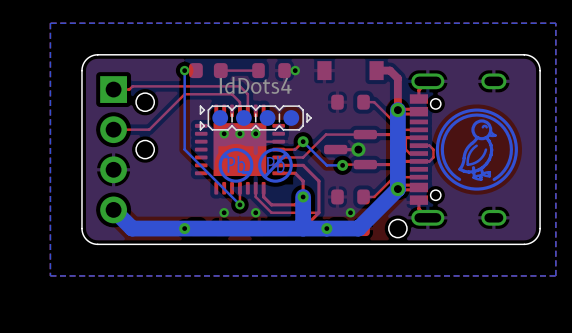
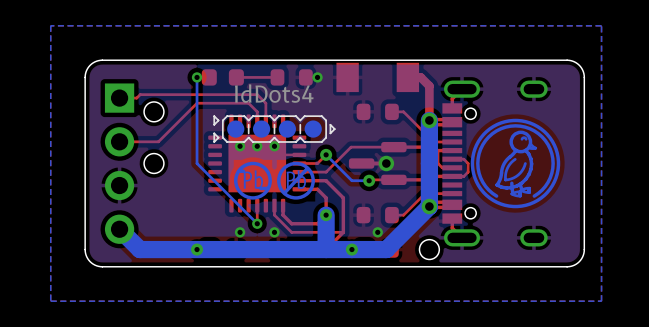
part footprint: [317, 61, 384, 81] -> [336, 62, 420, 93]

